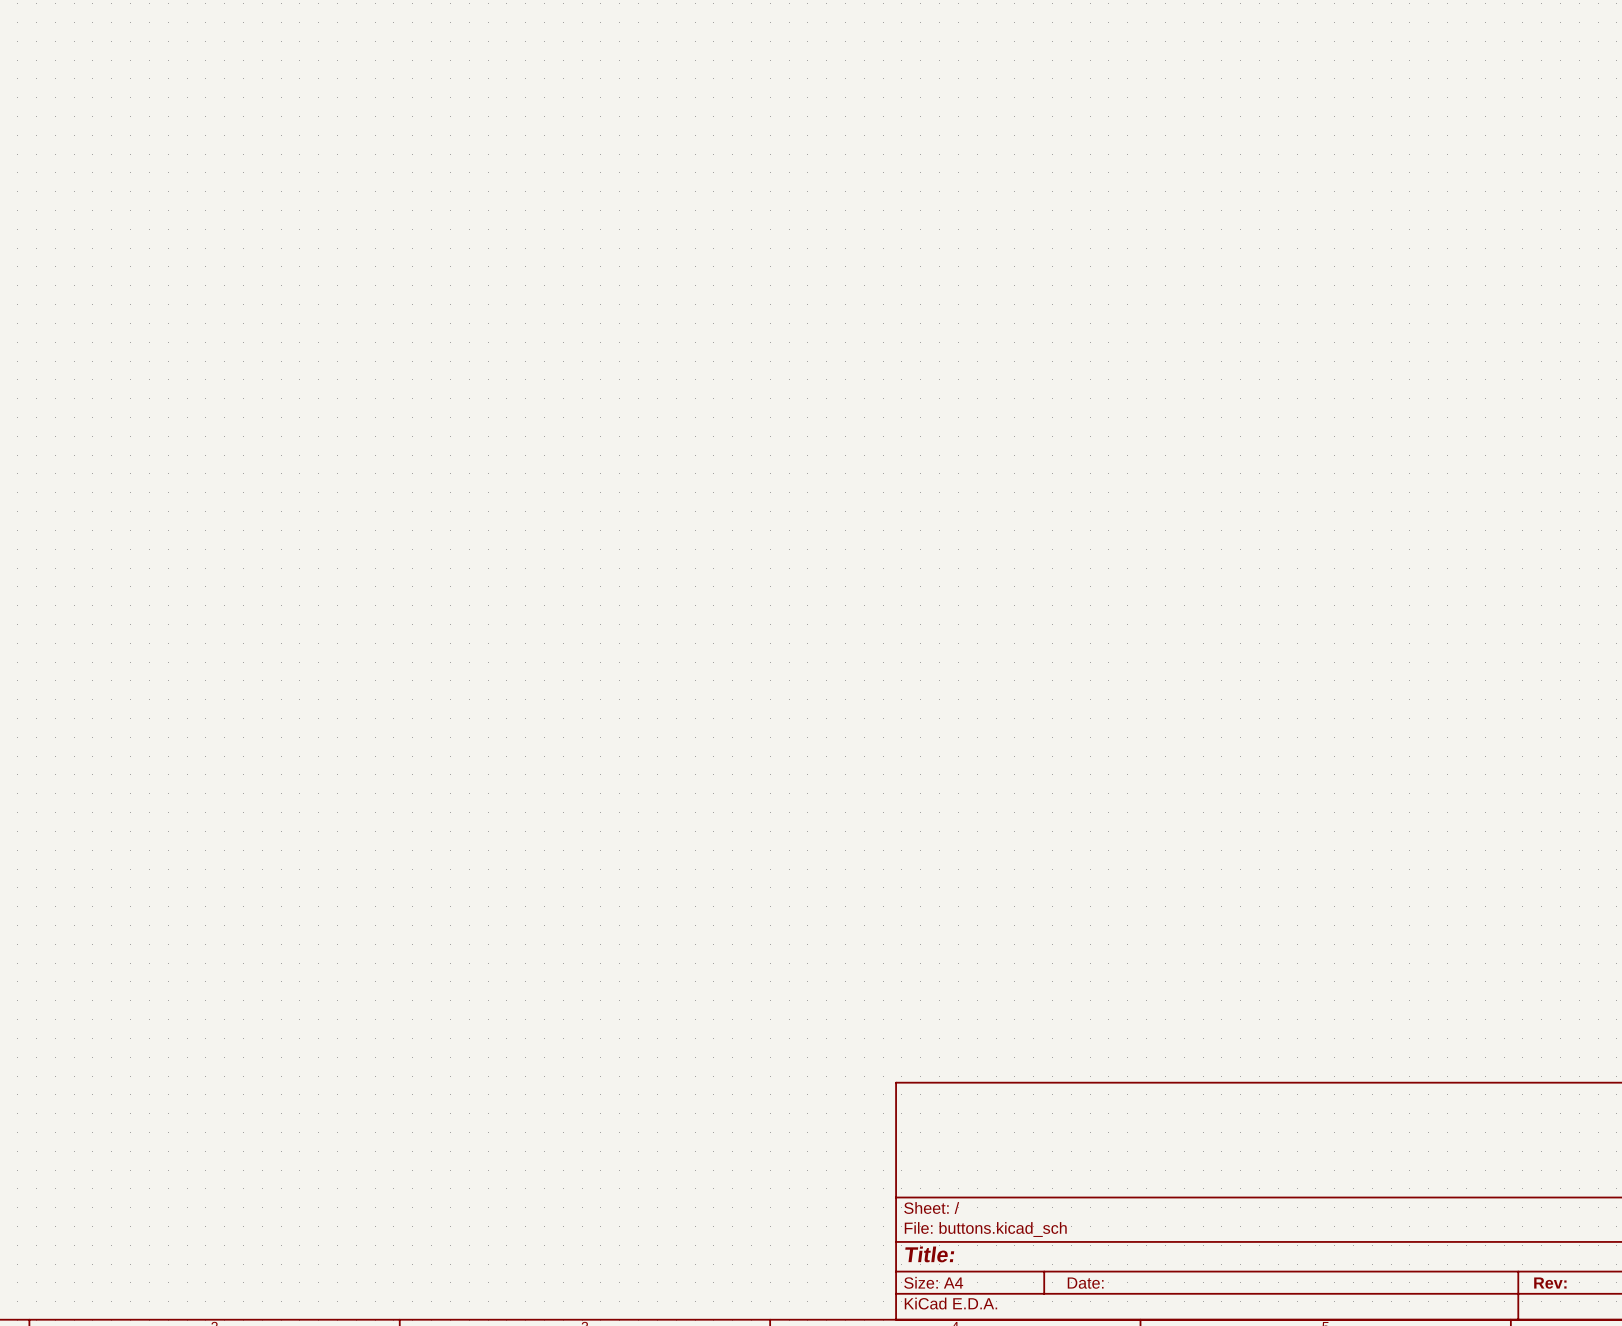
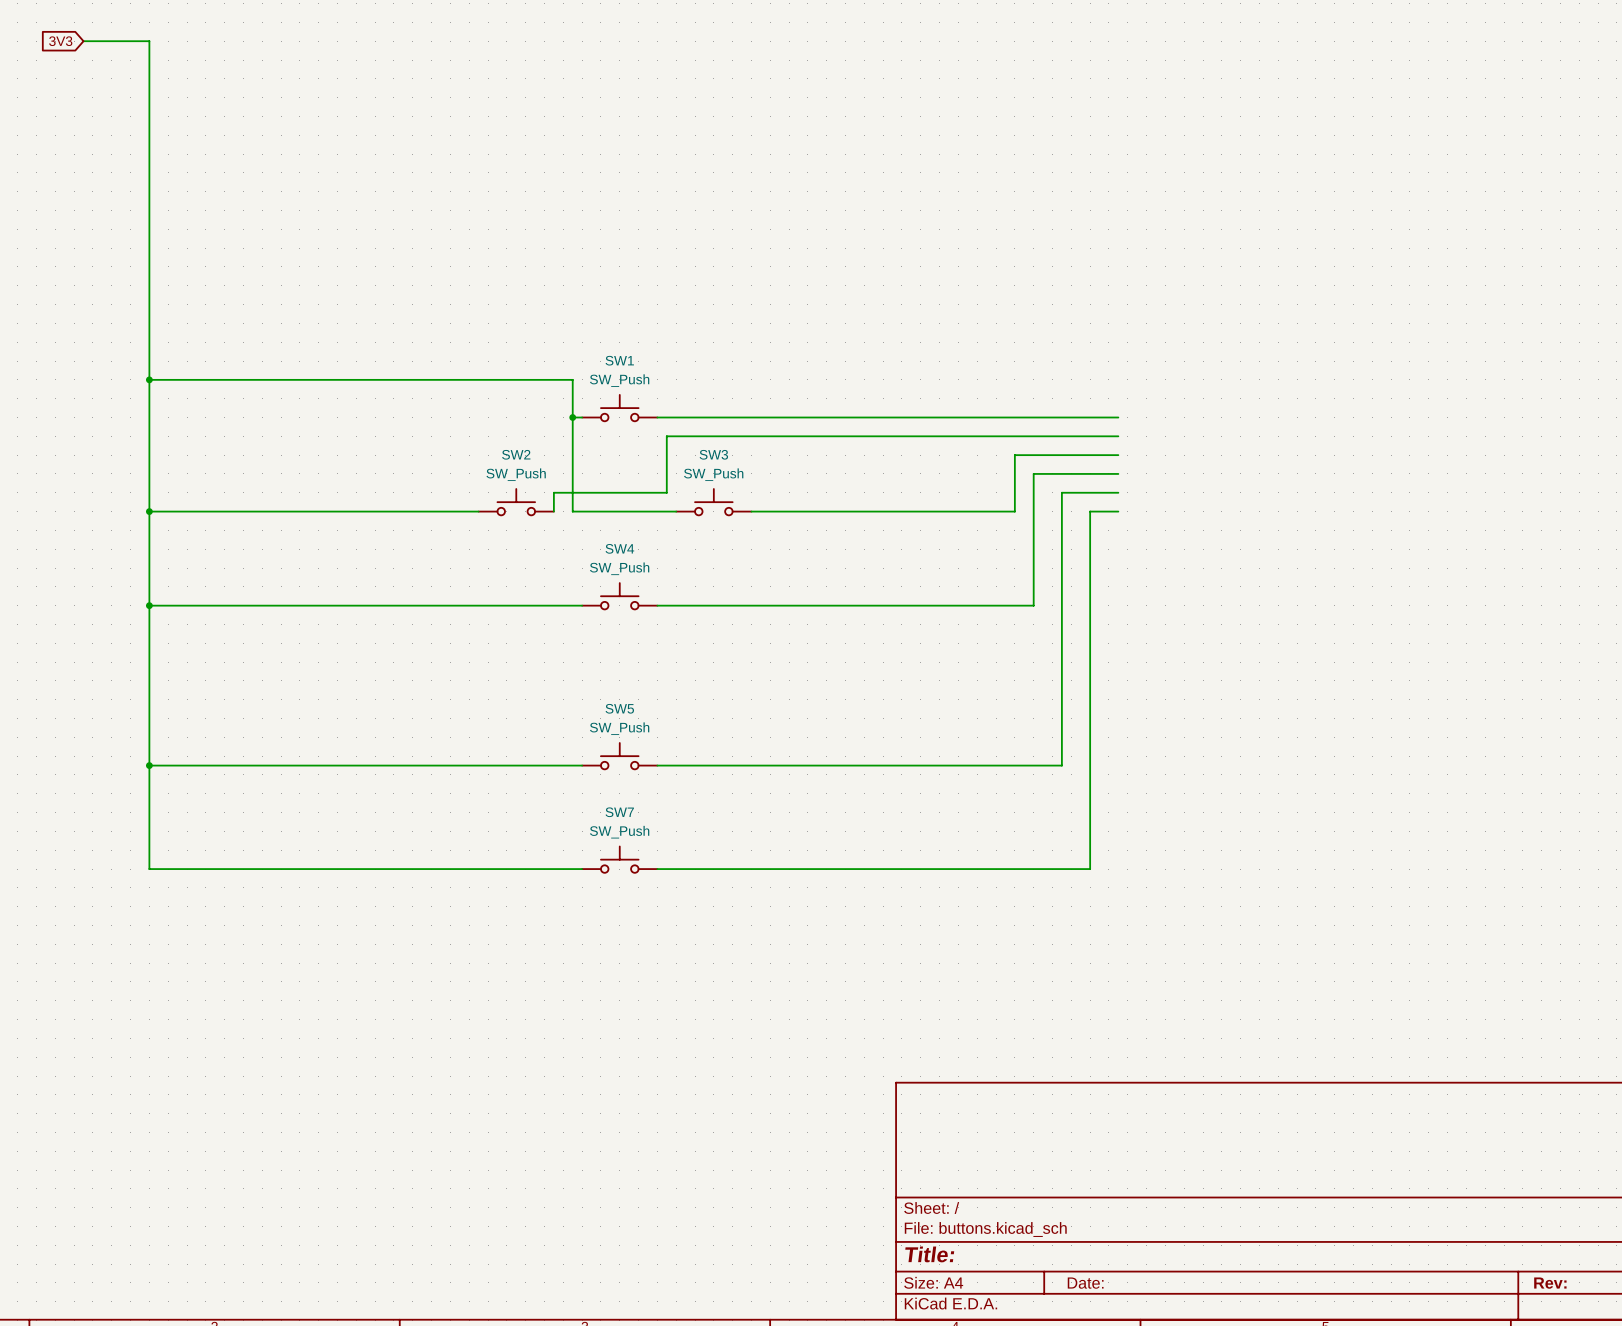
global label: none -> 3V3 (60, 41)
wire: none -> (83, 41) (149, 41) (149, 869) (582, 869)
wire: none -> (149, 379) (572, 379) (572, 511) (676, 511)
junction: none -> (149, 379)
SW1: none -> SW_Push (619, 408)
wire: none -> (572, 417) (582, 417)
junction: none -> (572, 417)
wire: none -> (657, 417) (1118, 417)
wire: none -> (1118, 436) (666, 436) (666, 492) (553, 492) (553, 511)
wire: none -> (1118, 455) (1014, 455) (1014, 511) (751, 511)
wire: none -> (1118, 473) (1033, 473) (1033, 605) (657, 605)
wire: none -> (1118, 492) (1061, 492) (1061, 765) (657, 765)
SW2: none -> SW_Push (516, 502)
SW3: none -> SW_Push (713, 502)
wire: none -> (149, 511) (478, 511)
junction: none -> (149, 511)
wire: none -> (1118, 511) (1090, 511) (1090, 869) (657, 869)
SW4: none -> SW_Push (619, 596)
wire: none -> (149, 605) (582, 605)
junction: none -> (149, 605)
SW5: none -> SW_Push (619, 756)
wire: none -> (149, 765) (582, 765)
junction: none -> (149, 765)
SW7: none -> SW_Push (619, 859)

